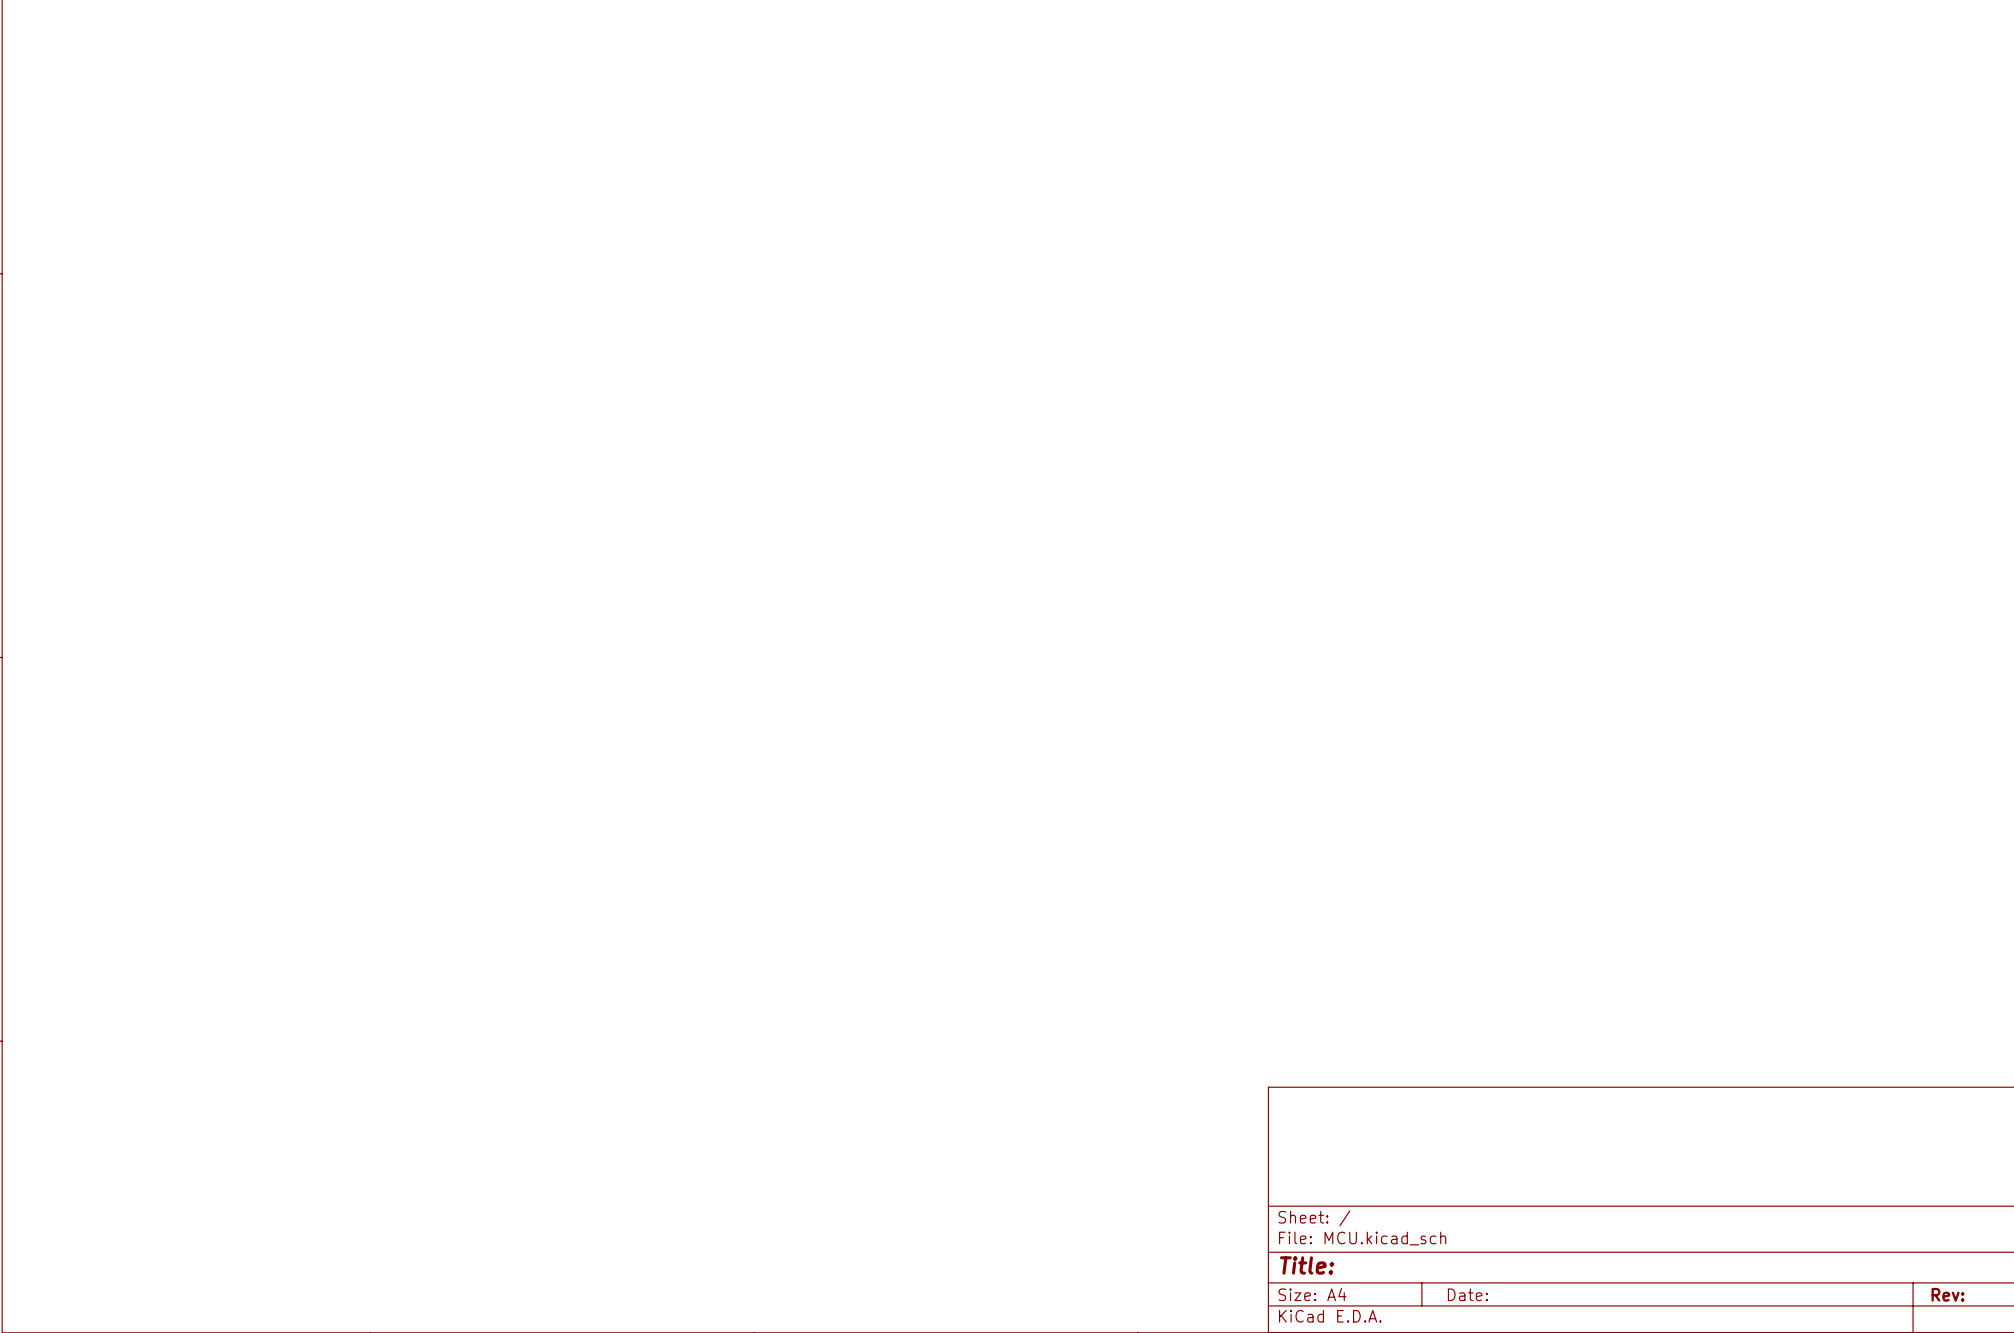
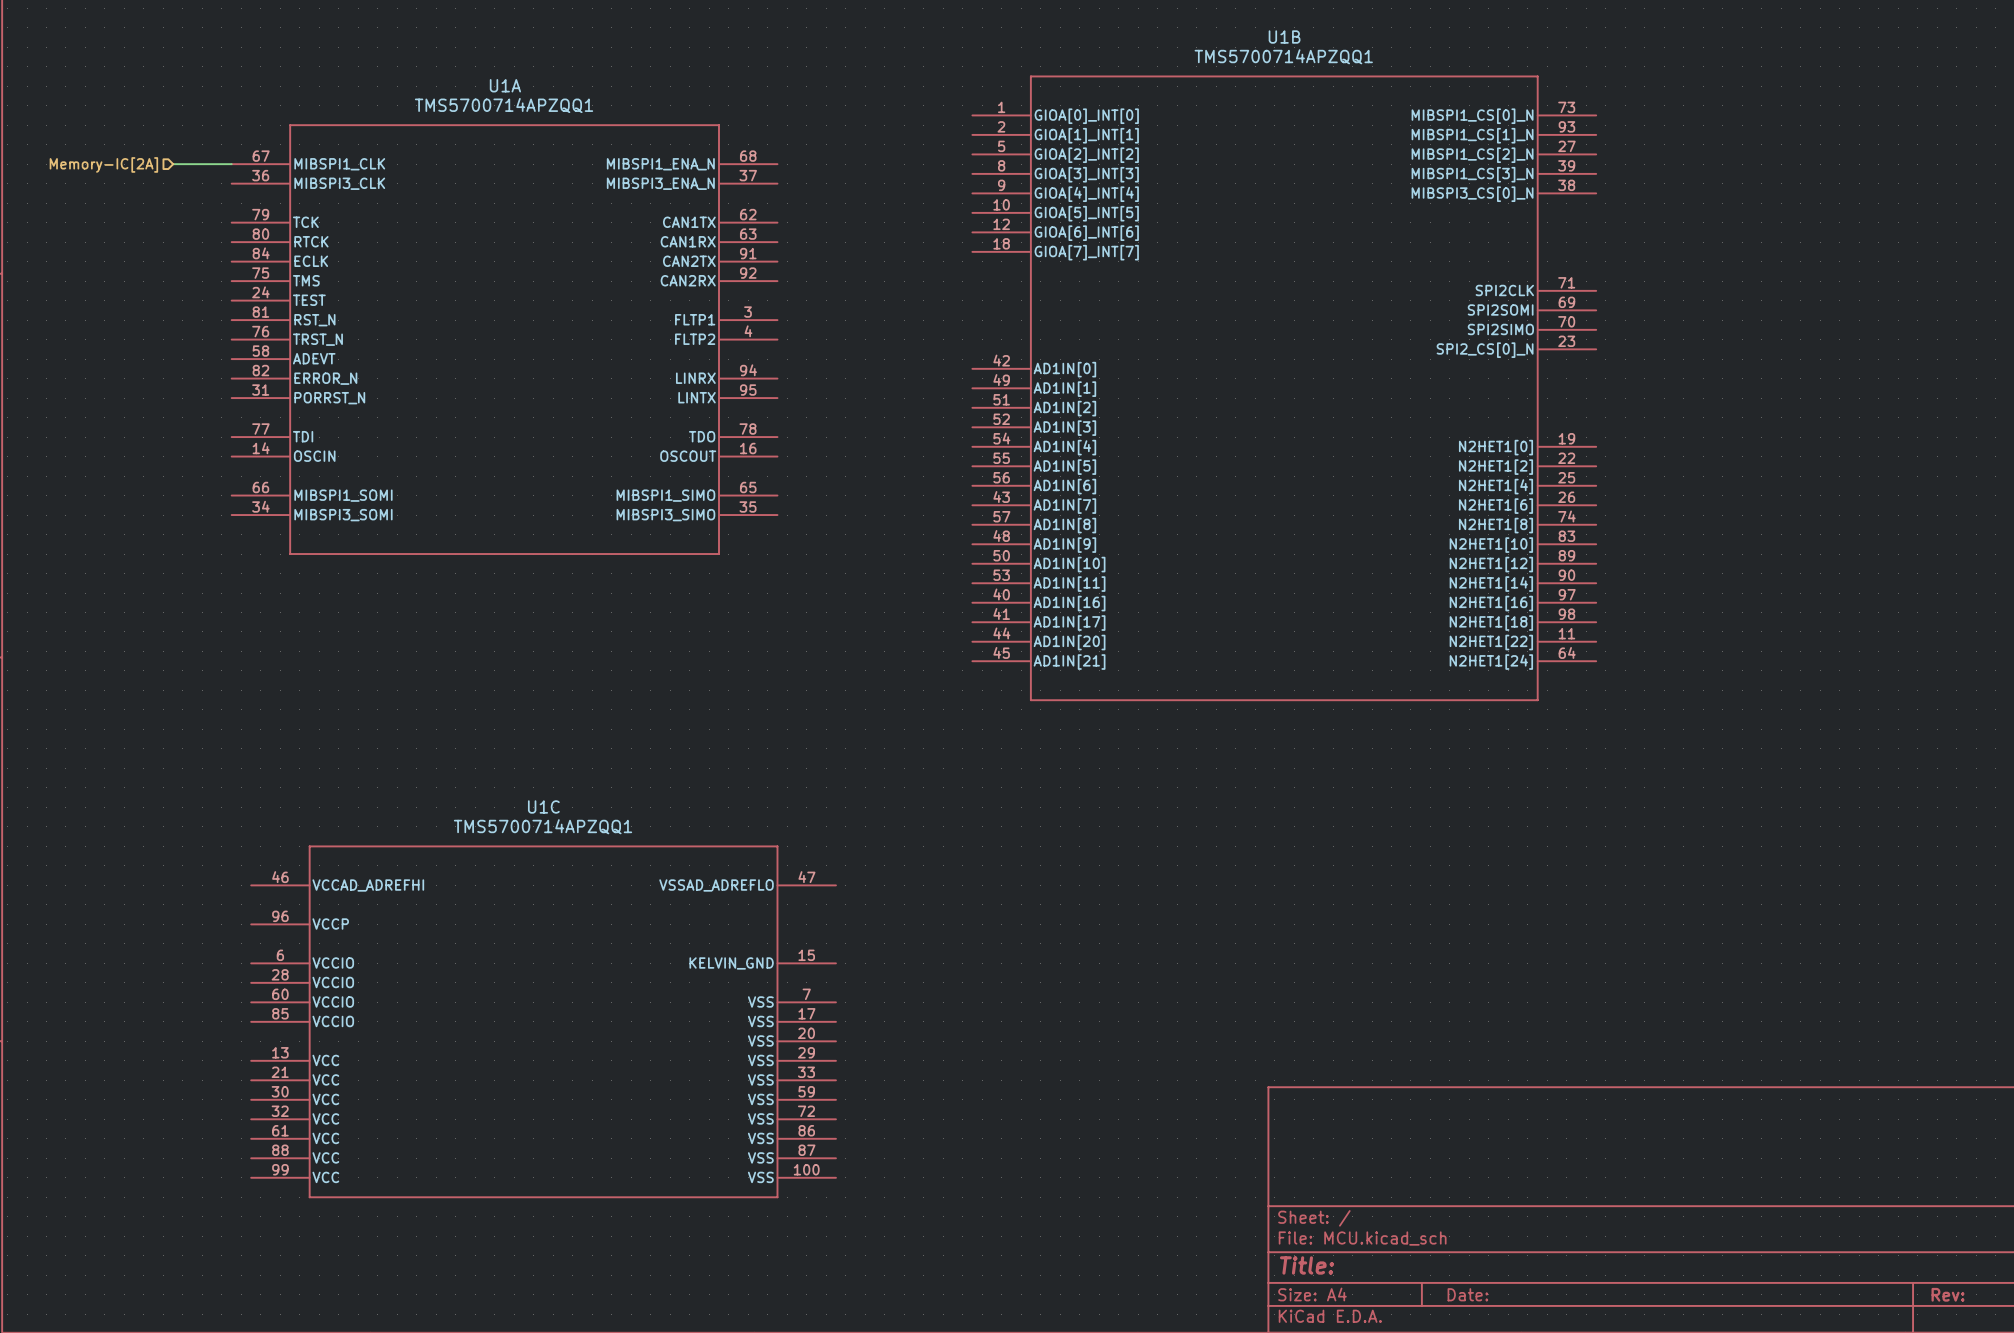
hierarchical label: none -> Memory-IC[2A] (103, 164)
wire: none -> (173, 164) (231, 164)
U1A: none -> TMS5700714APZQQ1 (504, 339)
U1B: none -> TMS5700714APZQQ1 (1284, 388)
U1C: none -> TMS5700714APZQQ1 (543, 1021)

